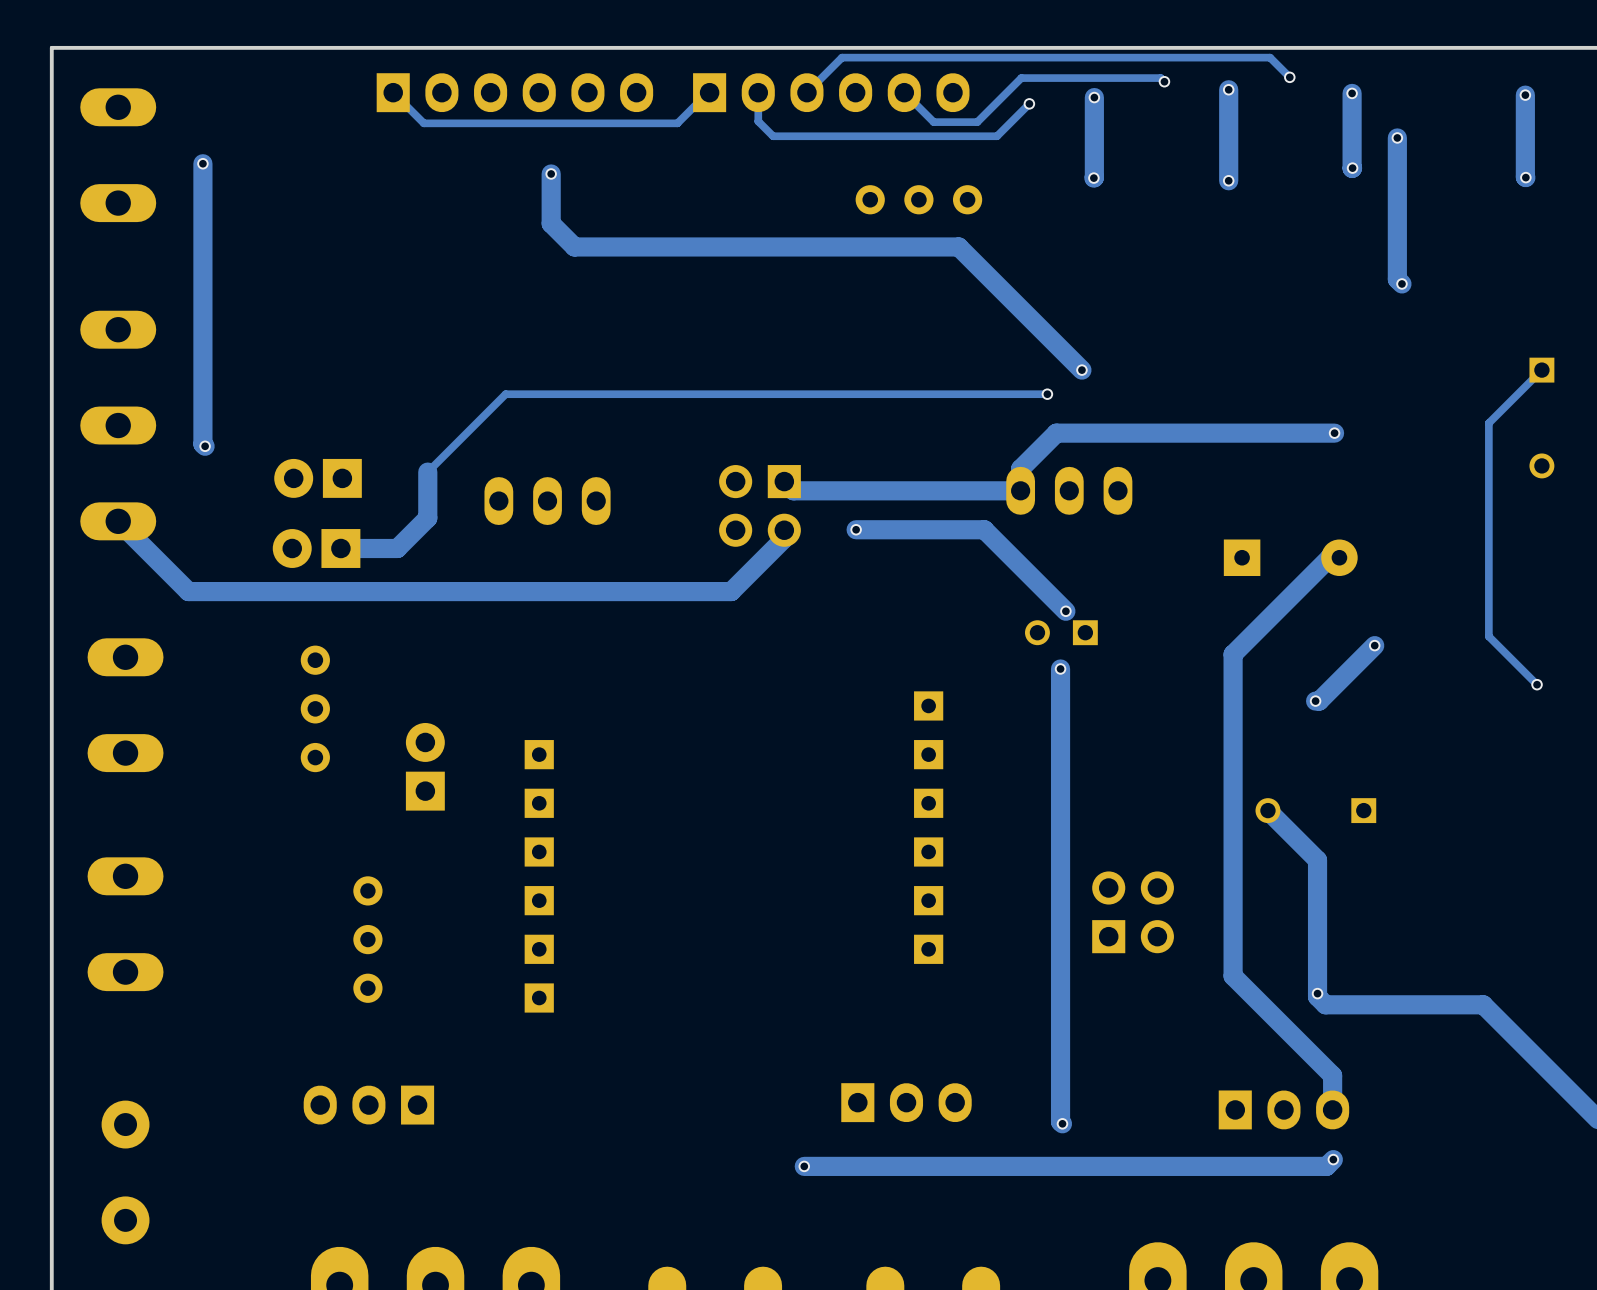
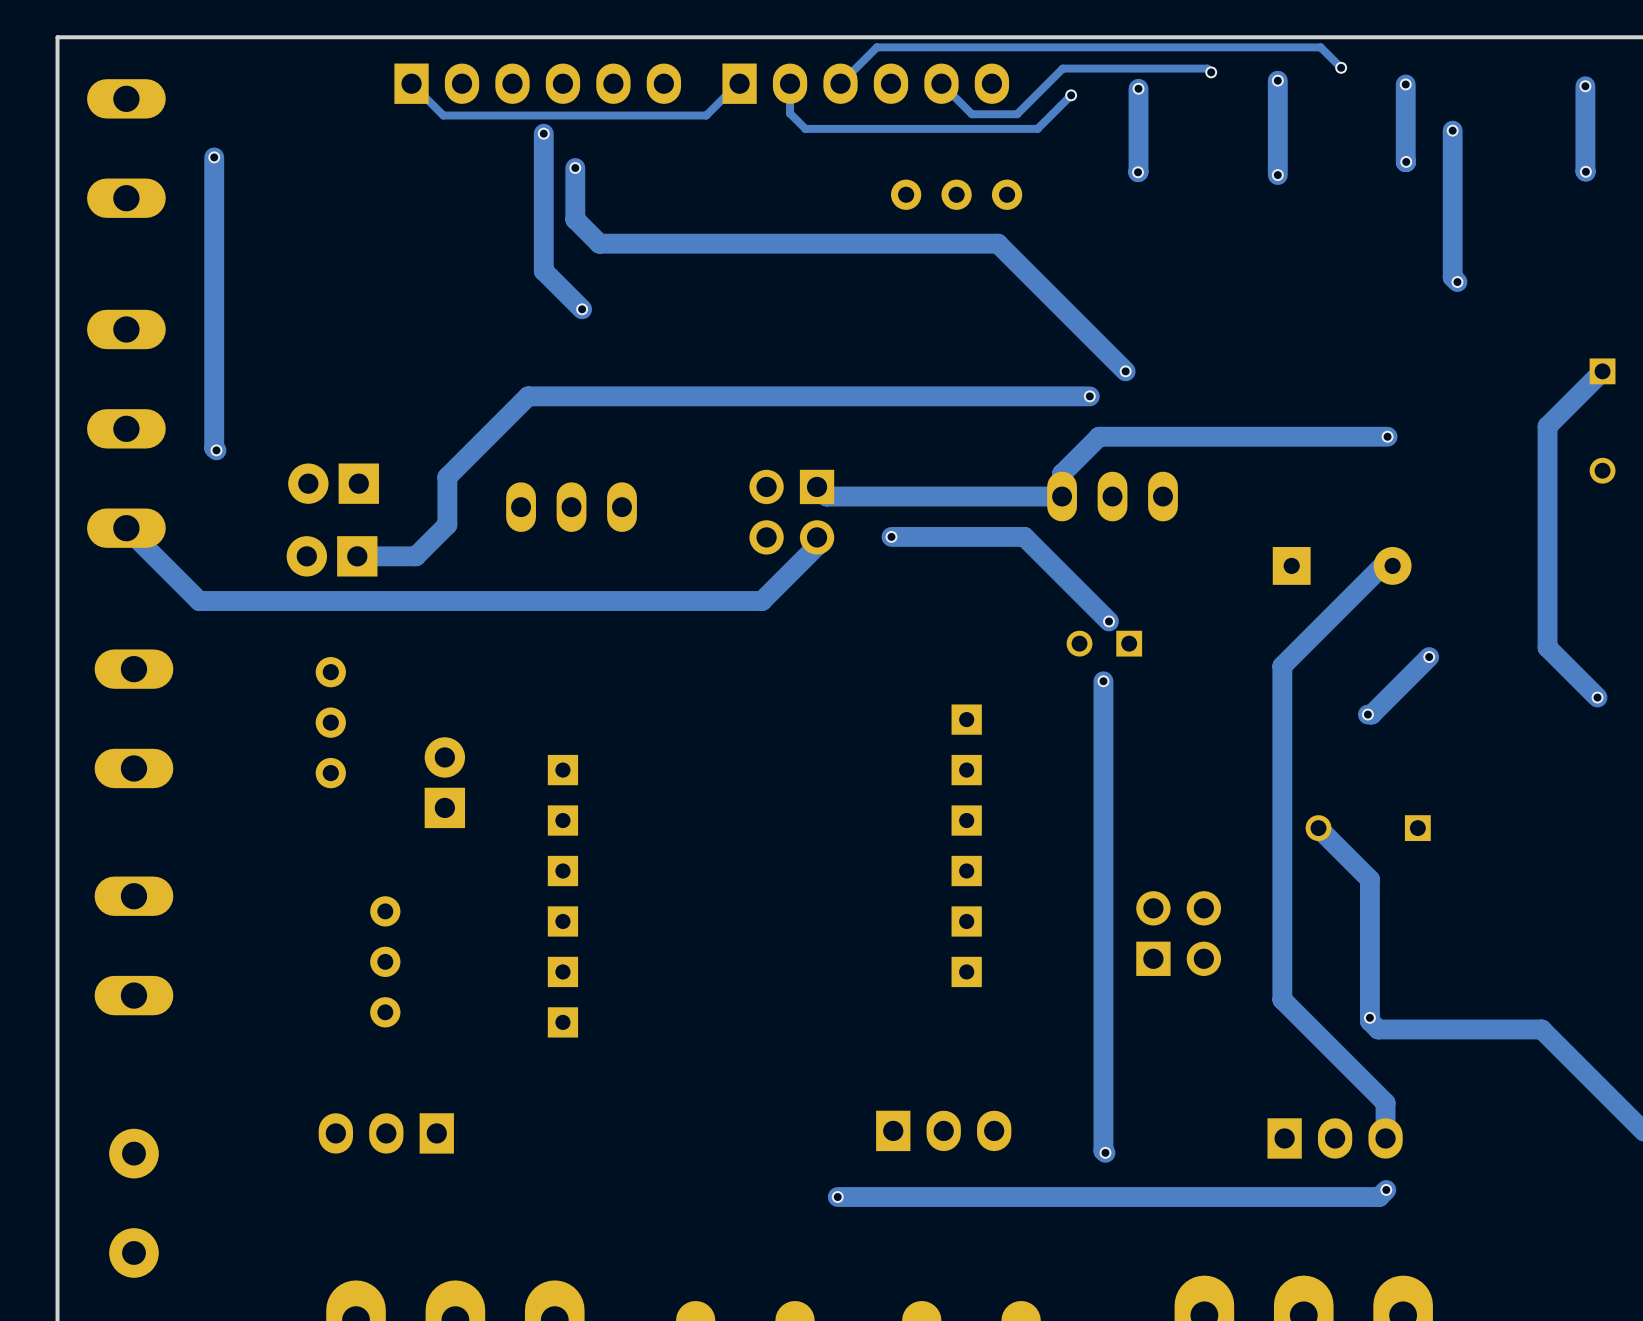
track: none -> (543, 133) (543, 270) (582, 309)
via: none -> (543, 133)
via: none -> (582, 309)
track width: thin (1541, 370) (1488, 423) (1488, 636) (1537, 684) -> thick (1602, 371) (1547, 426) (1547, 647) (1597, 697)
track width: thin (1047, 394) (505, 394) (427, 472) -> thick (1089, 396) (528, 396) (447, 477)

